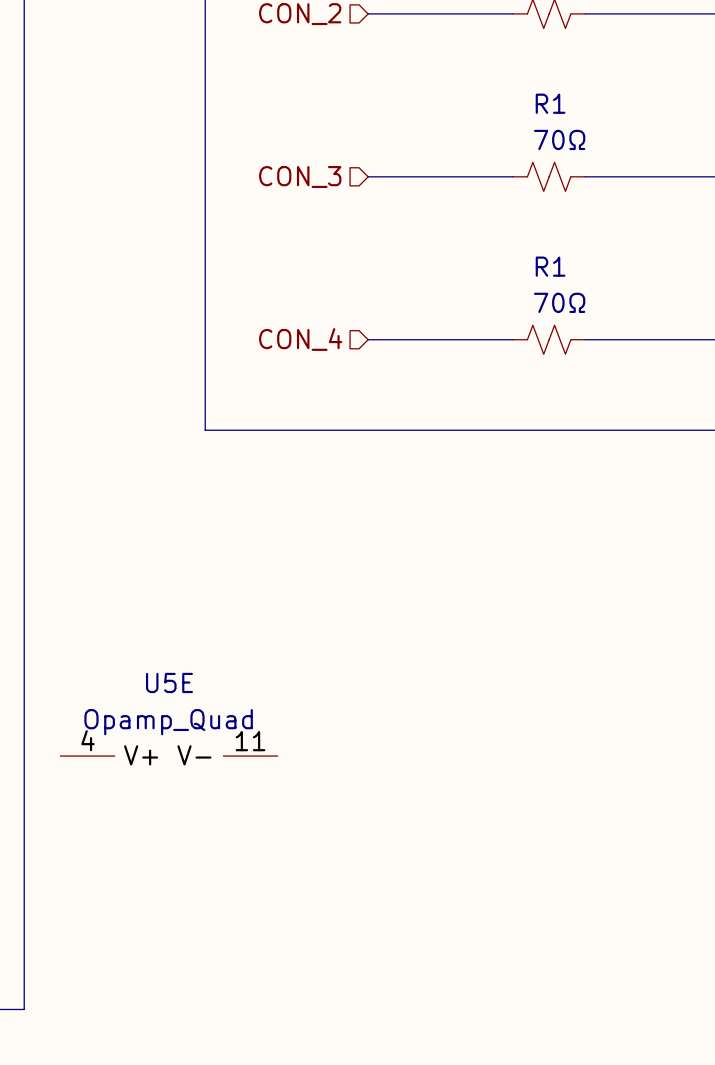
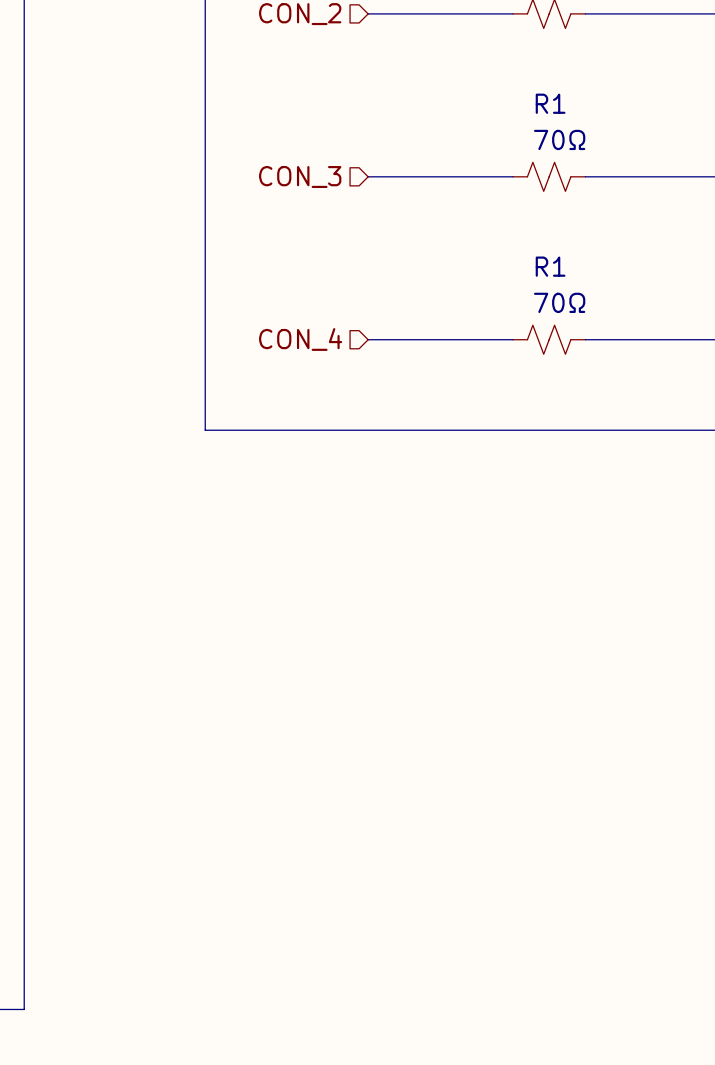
U5E: Opamp_Quad (169, 756) -> none

